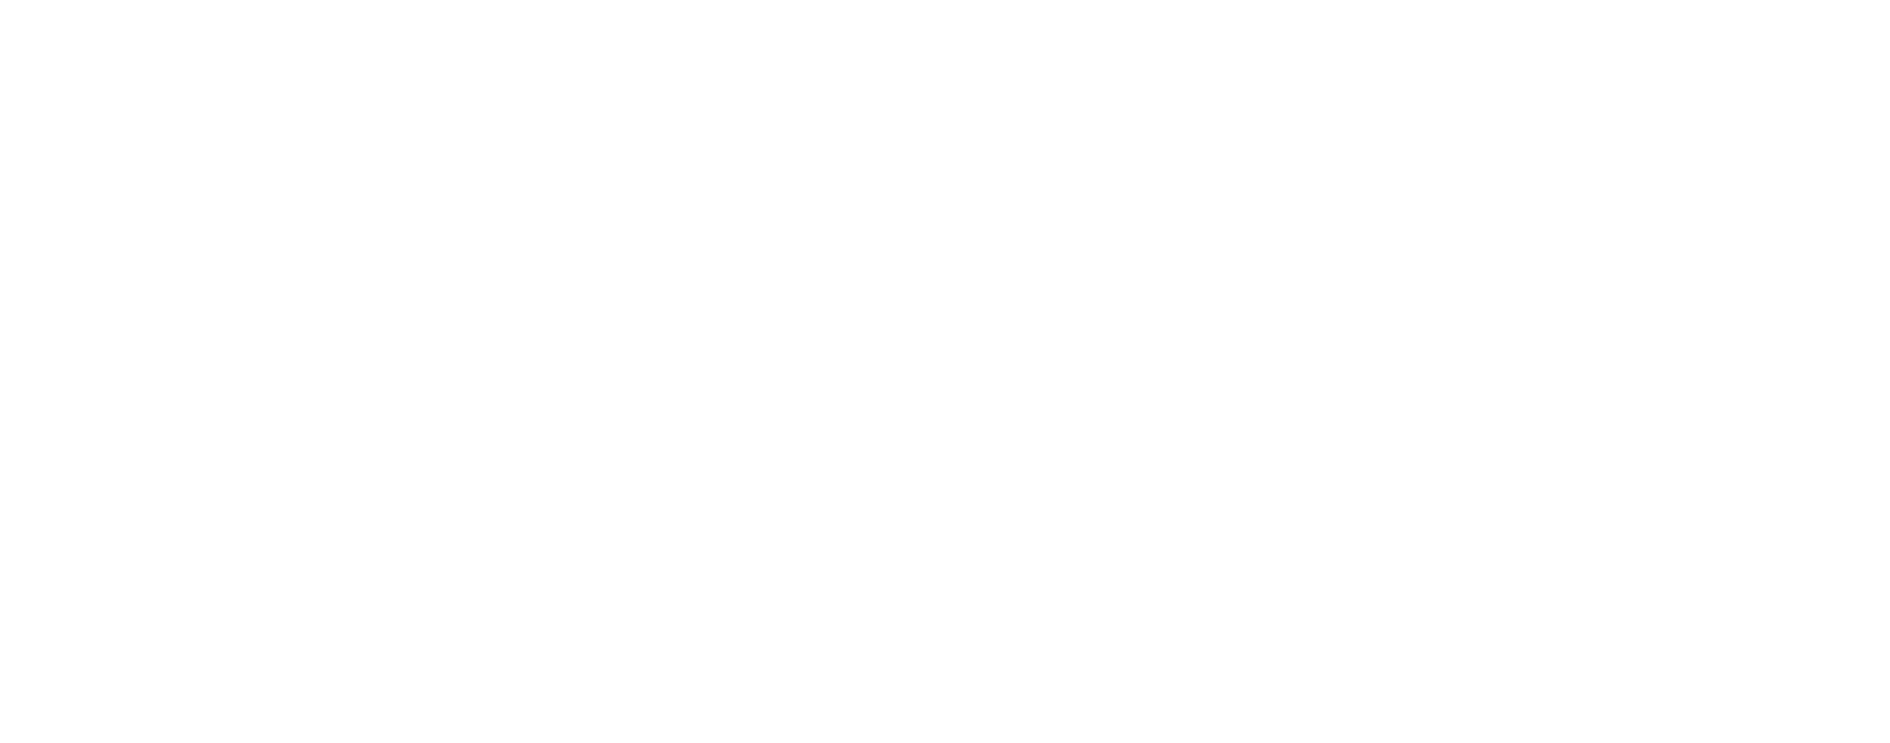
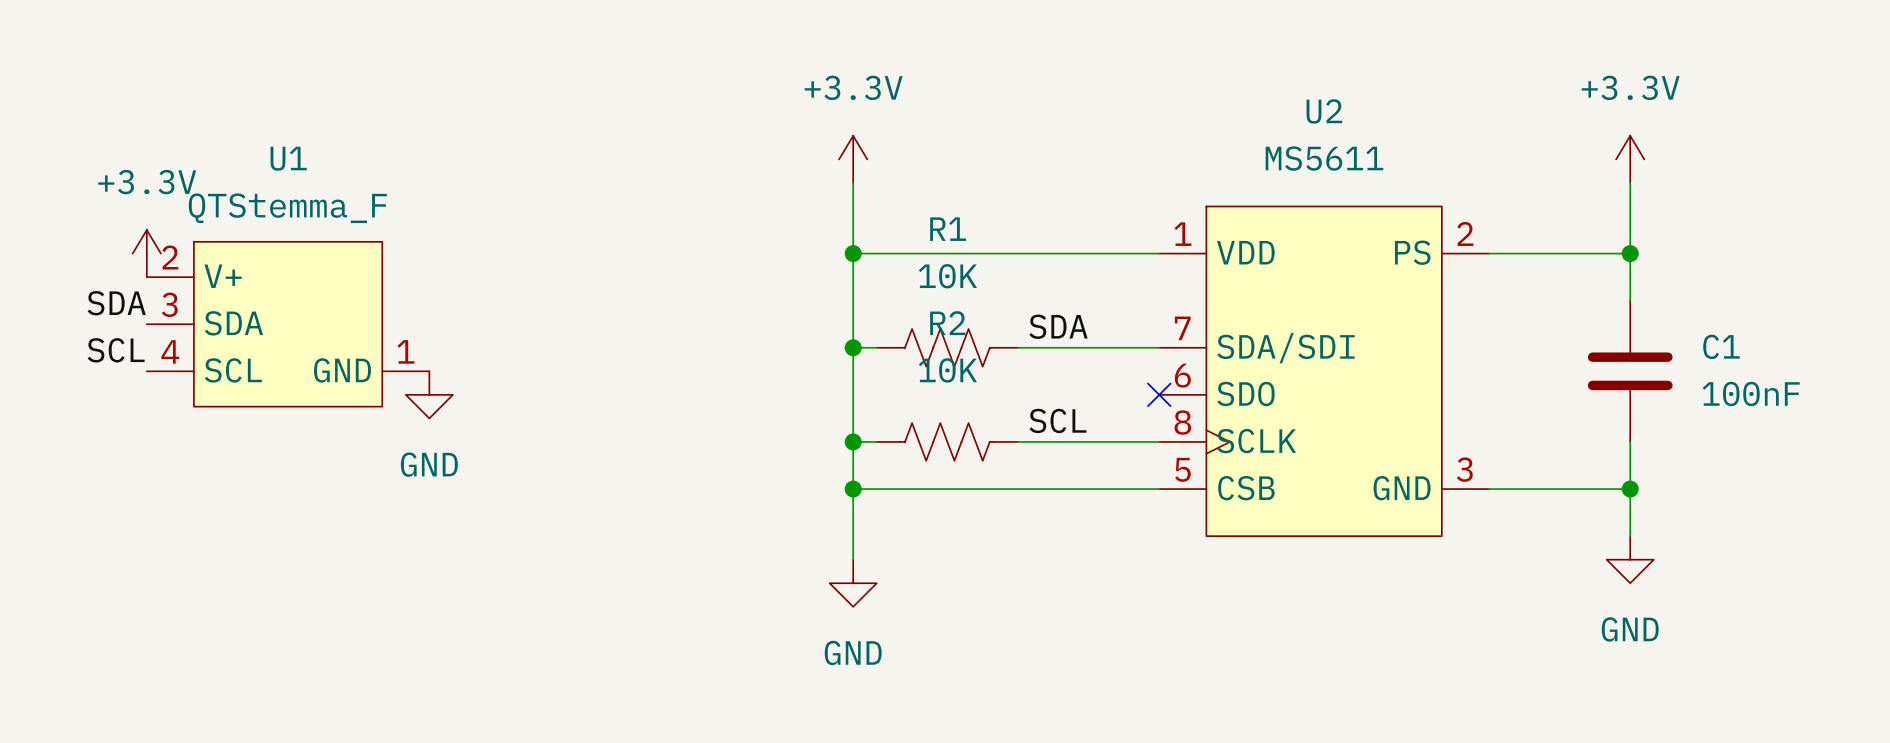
power symbol: none -> +3.3V (853, 159)
power symbol: none -> +3.3V (1630, 159)
wire: none -> (853, 182) (853, 559)
wire: none -> (1630, 182) (1630, 300)
power symbol: none -> +3.3V (146, 253)
wire: none -> (853, 253) (1159, 253)
junction: none -> (853, 253)
wire: none -> (1488, 253) (1630, 253)
junction: none -> (1630, 253)
label: none -> SDA (116, 303)
U1: none -> QTStemma_F (288, 324)
label: none -> SDA (1058, 326)
wire: none -> (853, 347) (876, 347)
junction: none -> (853, 347)
R1: none -> 10K (947, 347)
wire: none -> (1018, 347) (1159, 347)
label: none -> SCL (116, 350)
U2: none -> MS5611 (1324, 371)
C1: none -> 100nF (1630, 371)
power symbol: none -> GND (429, 394)
no-connect mark: none -> (1159, 394)
label: none -> SCL (1057, 420)
wire: none -> (853, 441) (876, 441)
junction: none -> (853, 441)
R2: none -> 10K (947, 441)
wire: none -> (1018, 441) (1159, 441)
wire: none -> (1630, 441) (1630, 536)
wire: none -> (853, 489) (1159, 489)
junction: none -> (853, 489)
wire: none -> (1488, 489) (1630, 489)
junction: none -> (1630, 489)
power symbol: none -> GND (1630, 559)
power symbol: none -> GND (853, 583)

